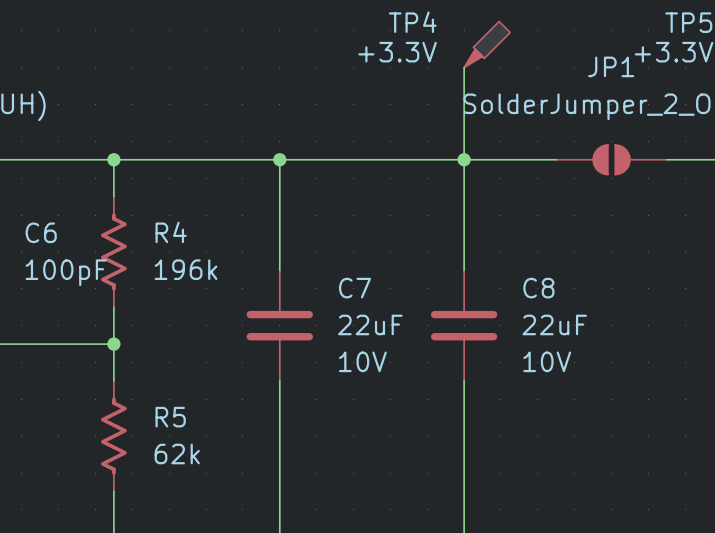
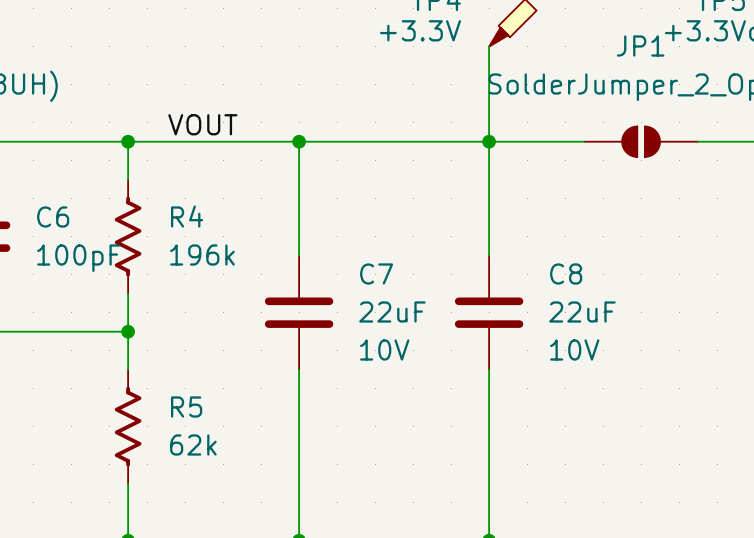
label: none -> VOUT (202, 124)

